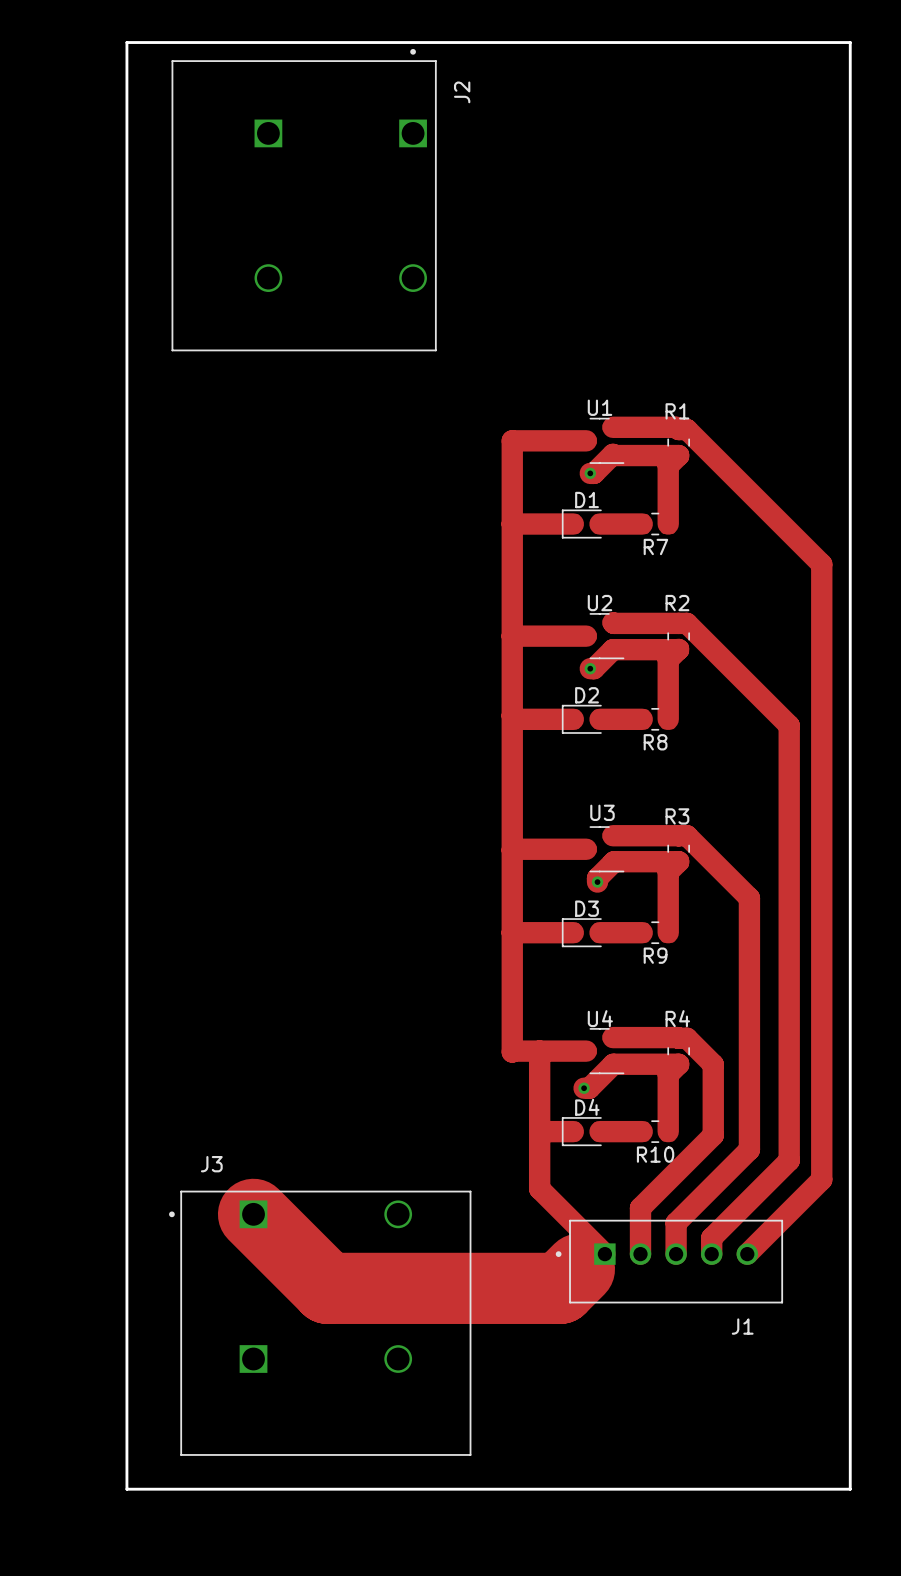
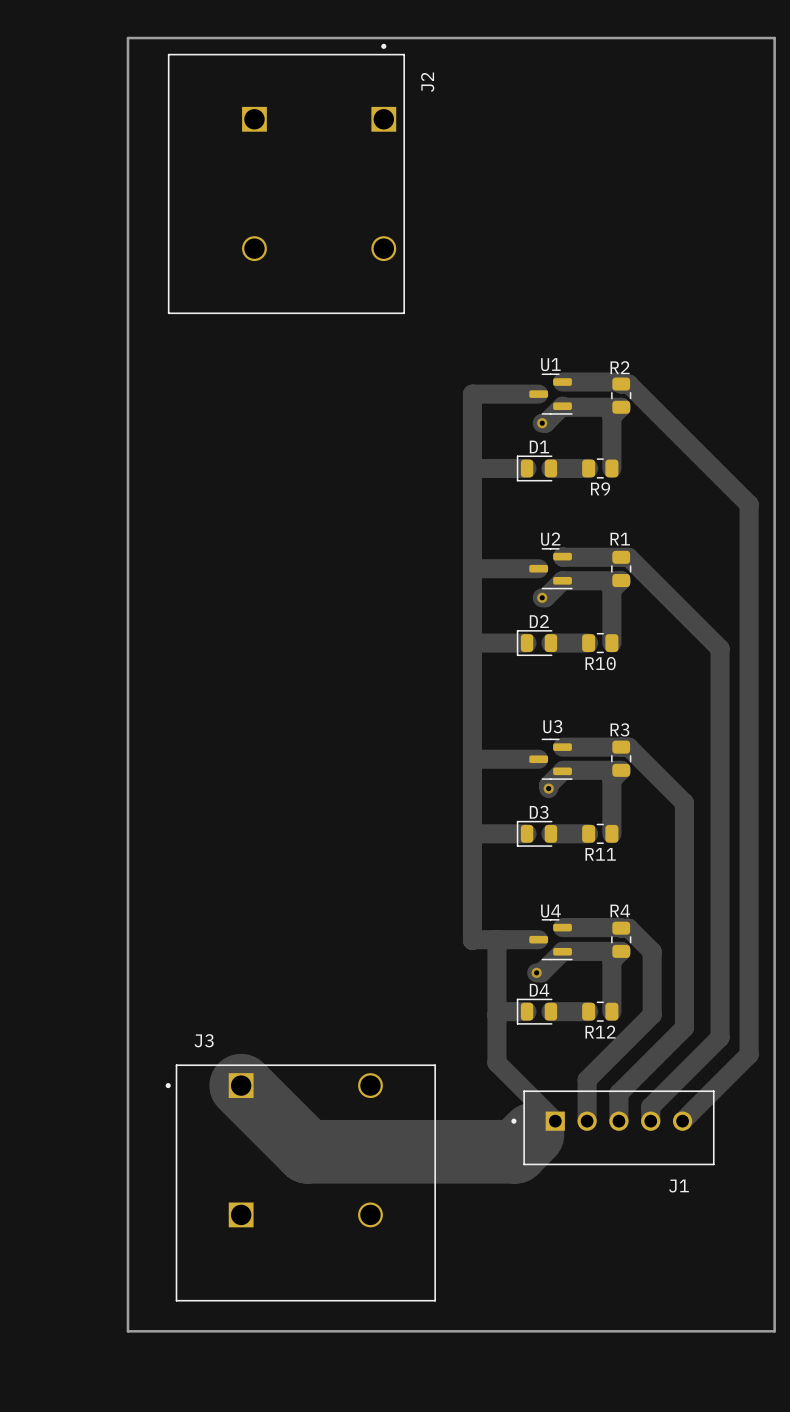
R1 name: R1 (677, 411) -> R2 (620, 367)
R7 name: R7 (655, 546) -> R9 (600, 488)
R2 name: R2 (677, 603) -> R1 (620, 539)
R8 name: R8 (655, 742) -> R10 (600, 663)
R9 name: R9 (655, 955) -> R11 (600, 854)
R10 name: R10 (655, 1154) -> R12 (600, 1032)

